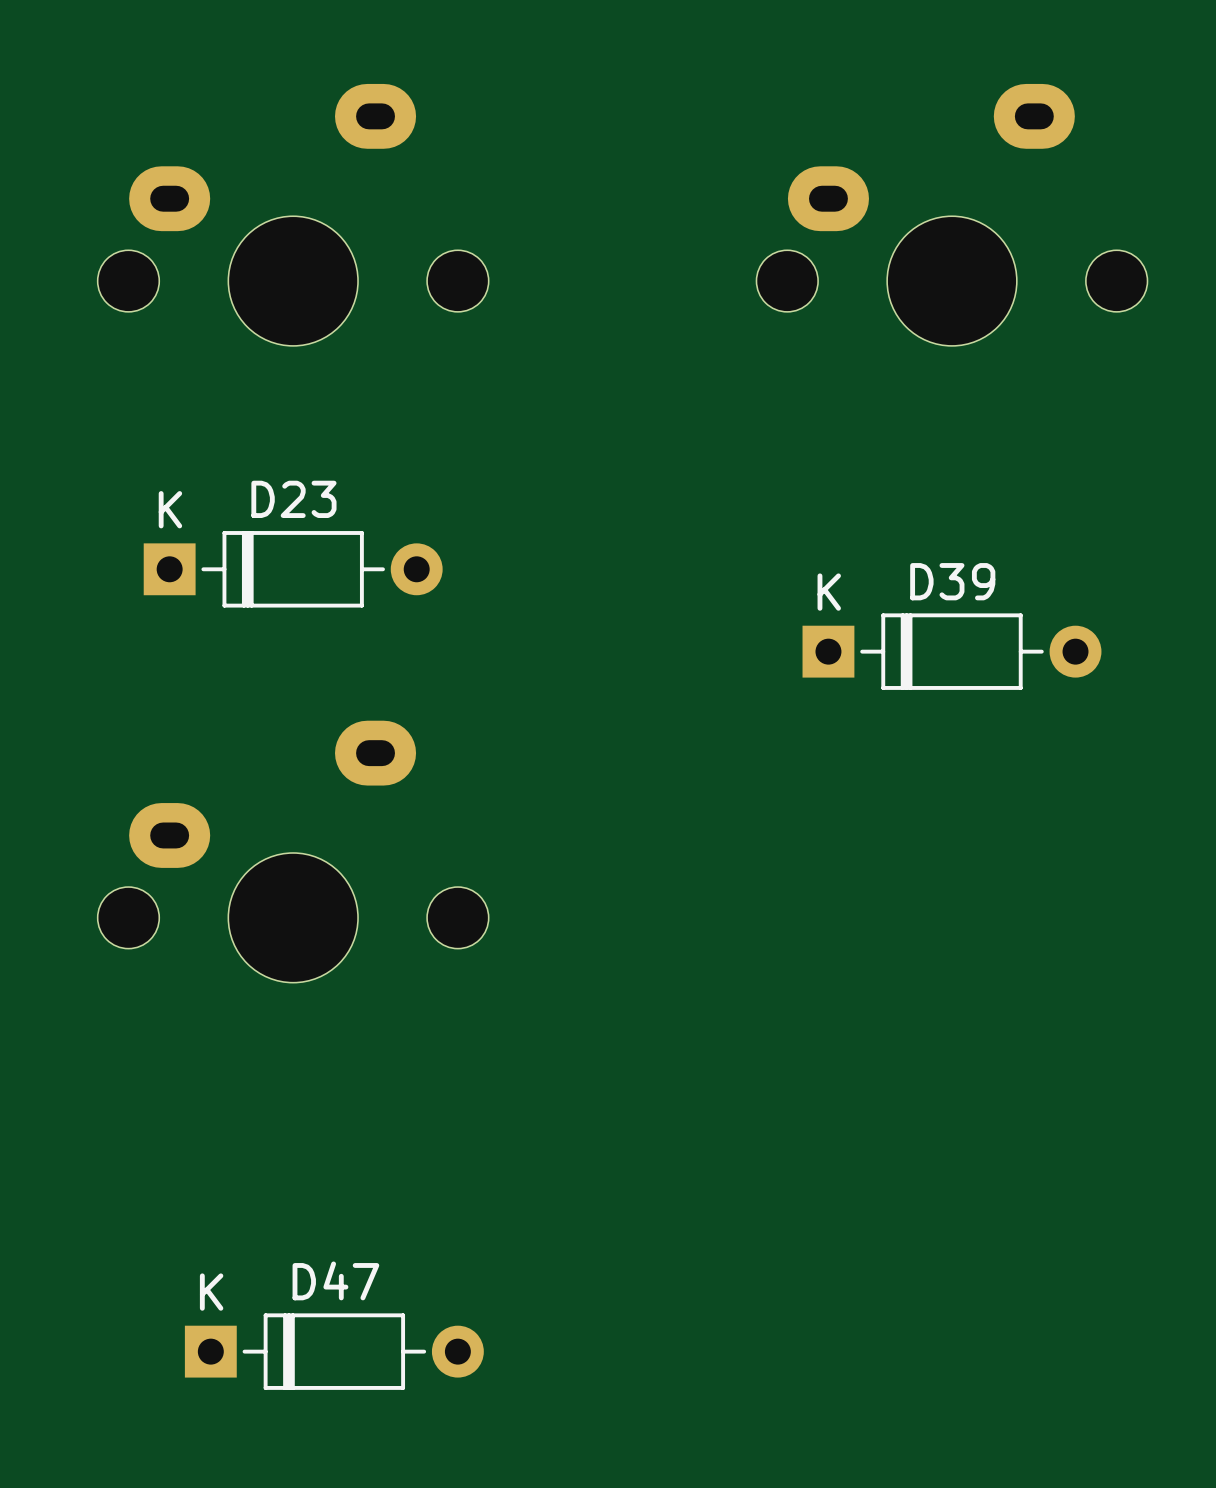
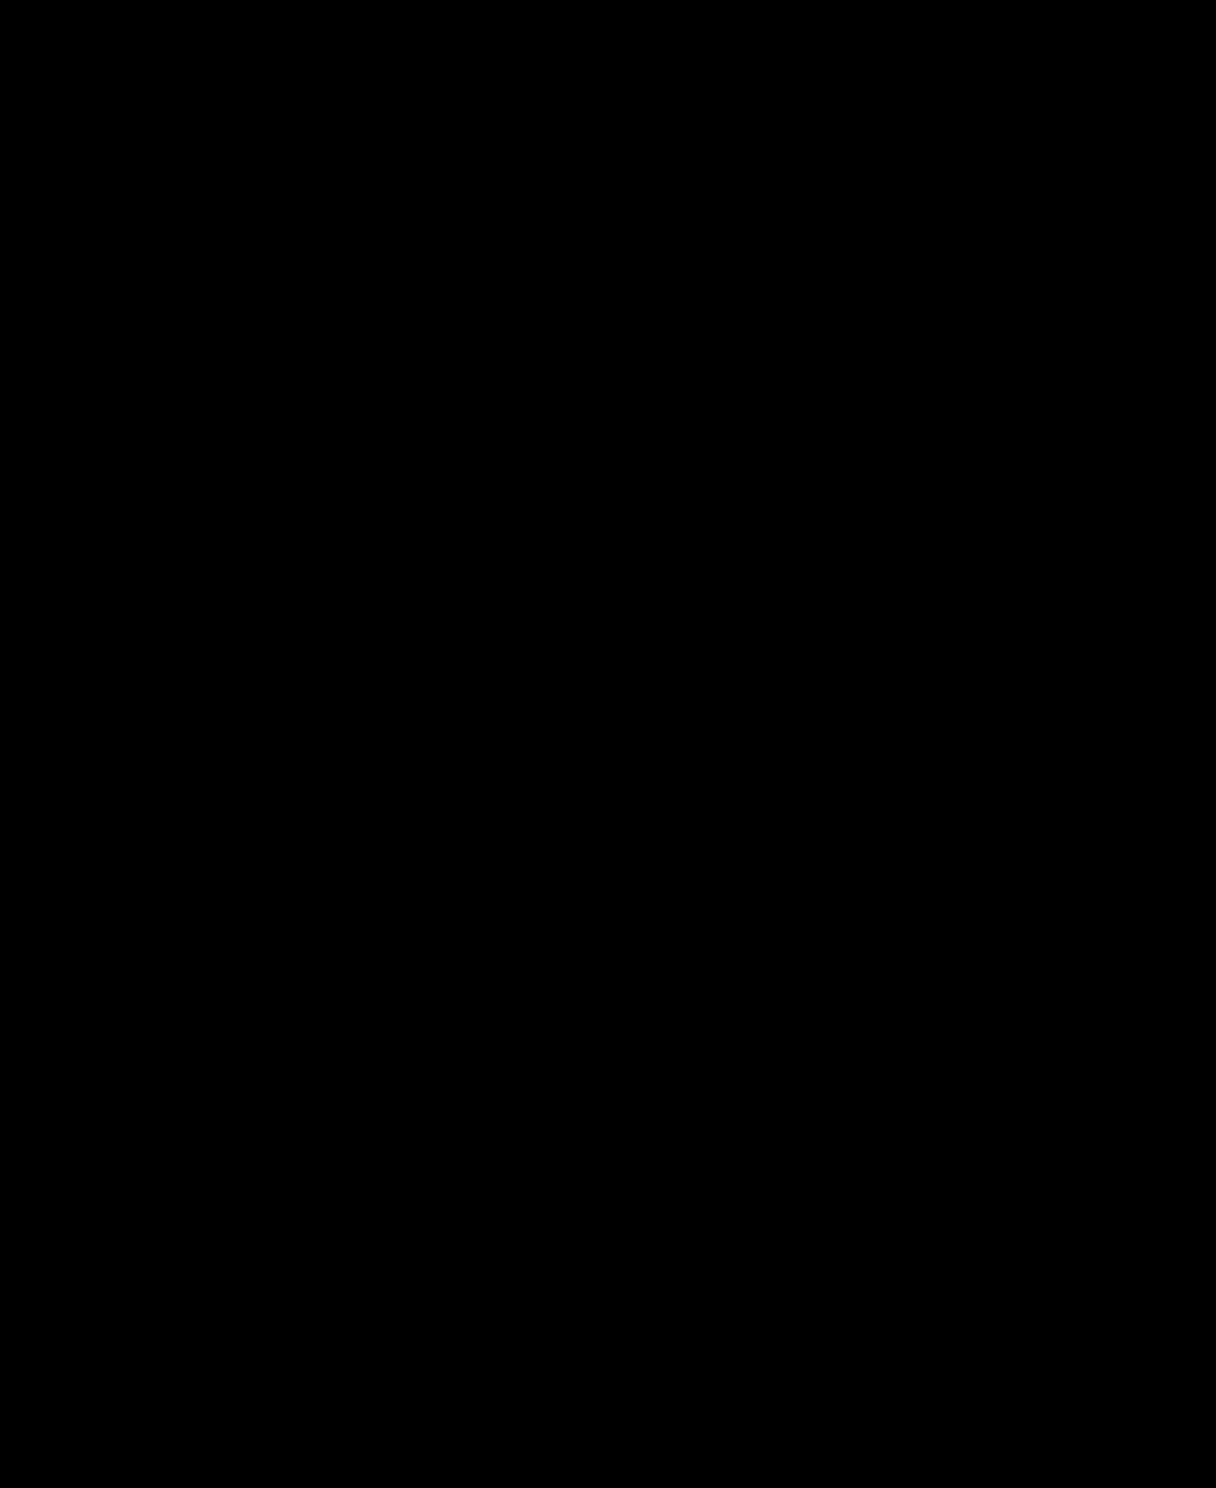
part: (293, 214) -> none
part: (951, 214) -> none
D23: (293, 569) -> none
D39: (951, 651) -> none
part: (293, 851) -> none
D47: (334, 1351) -> none

